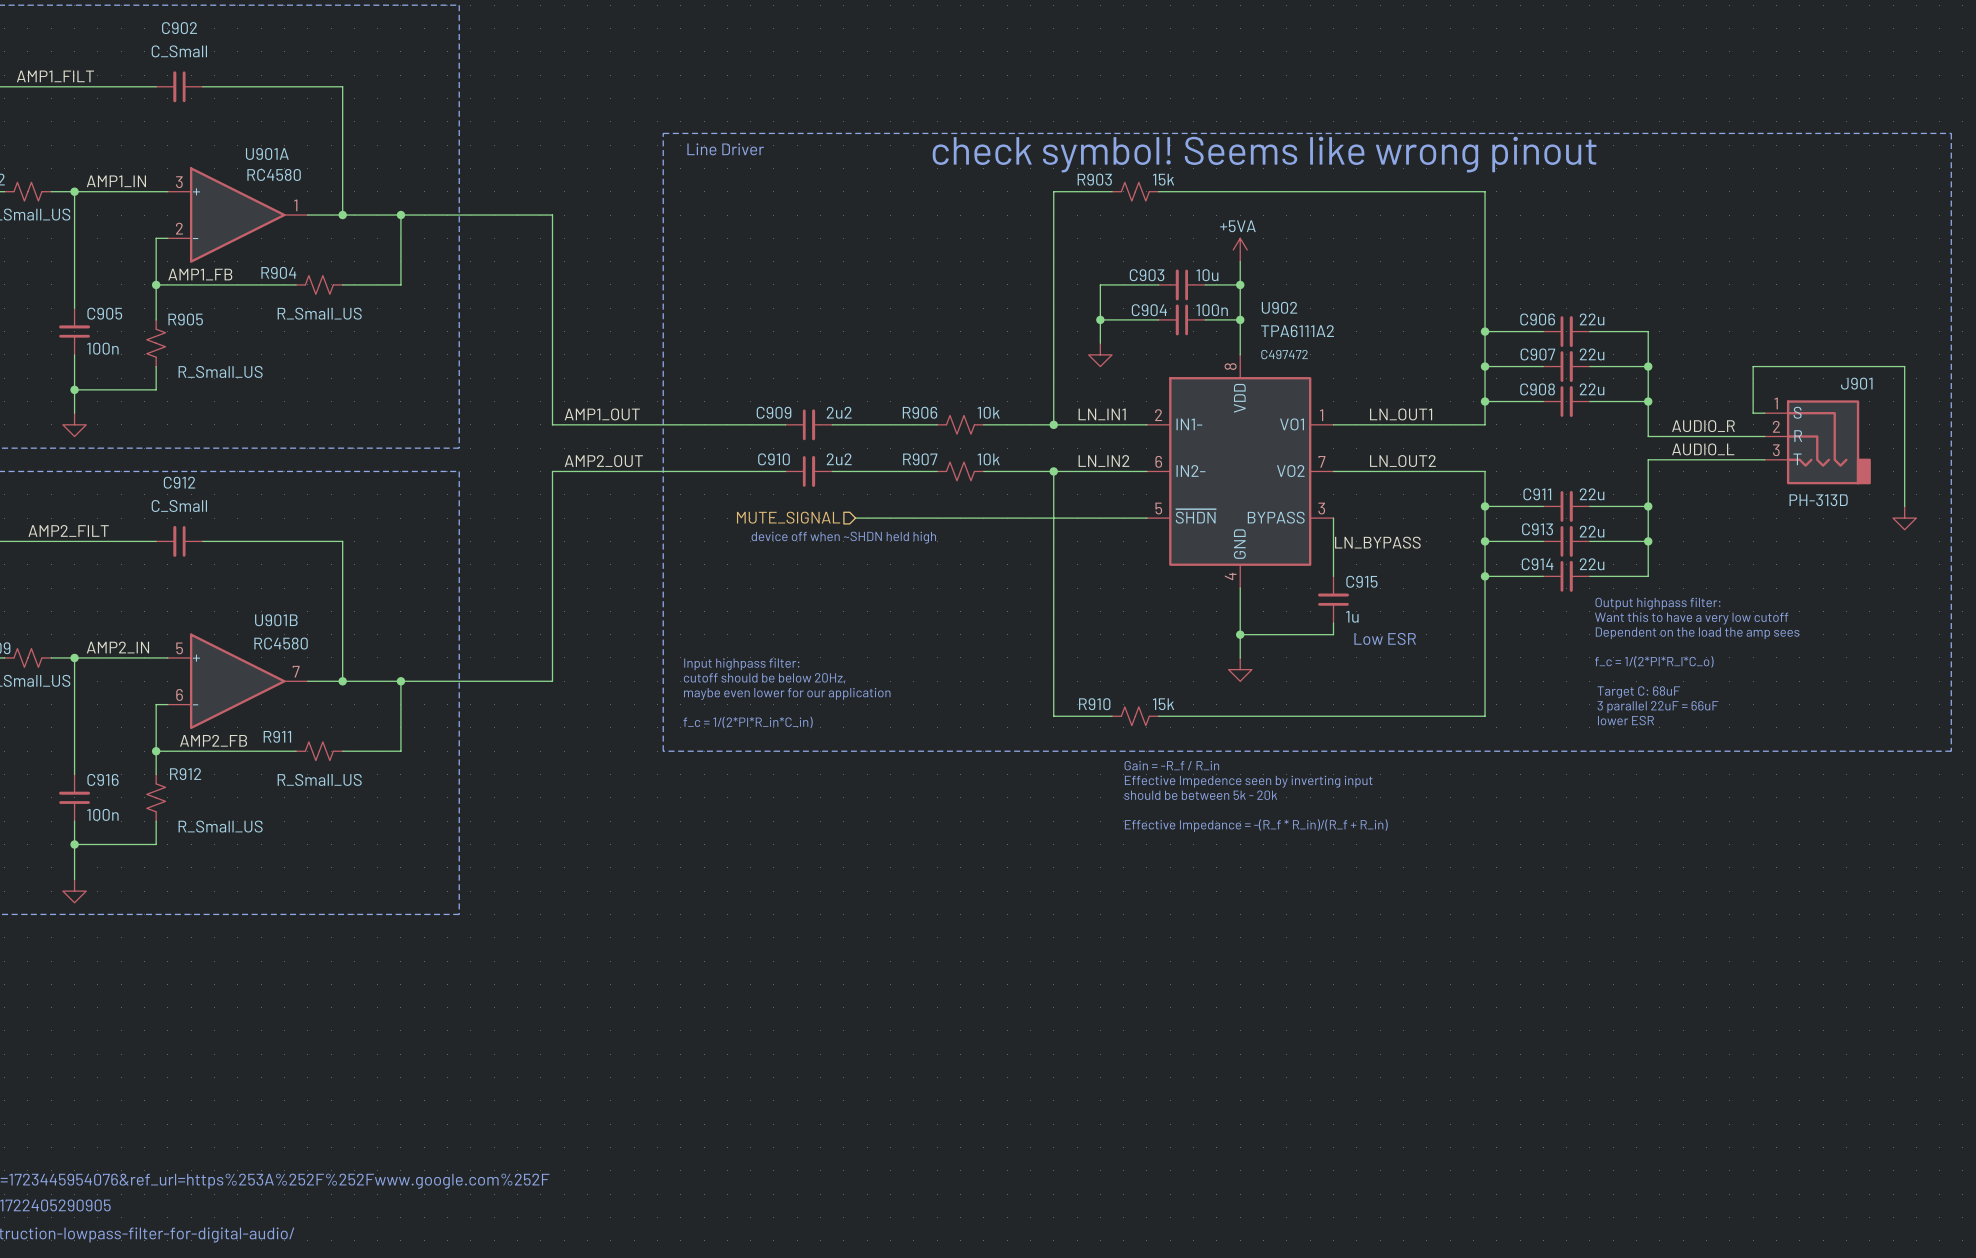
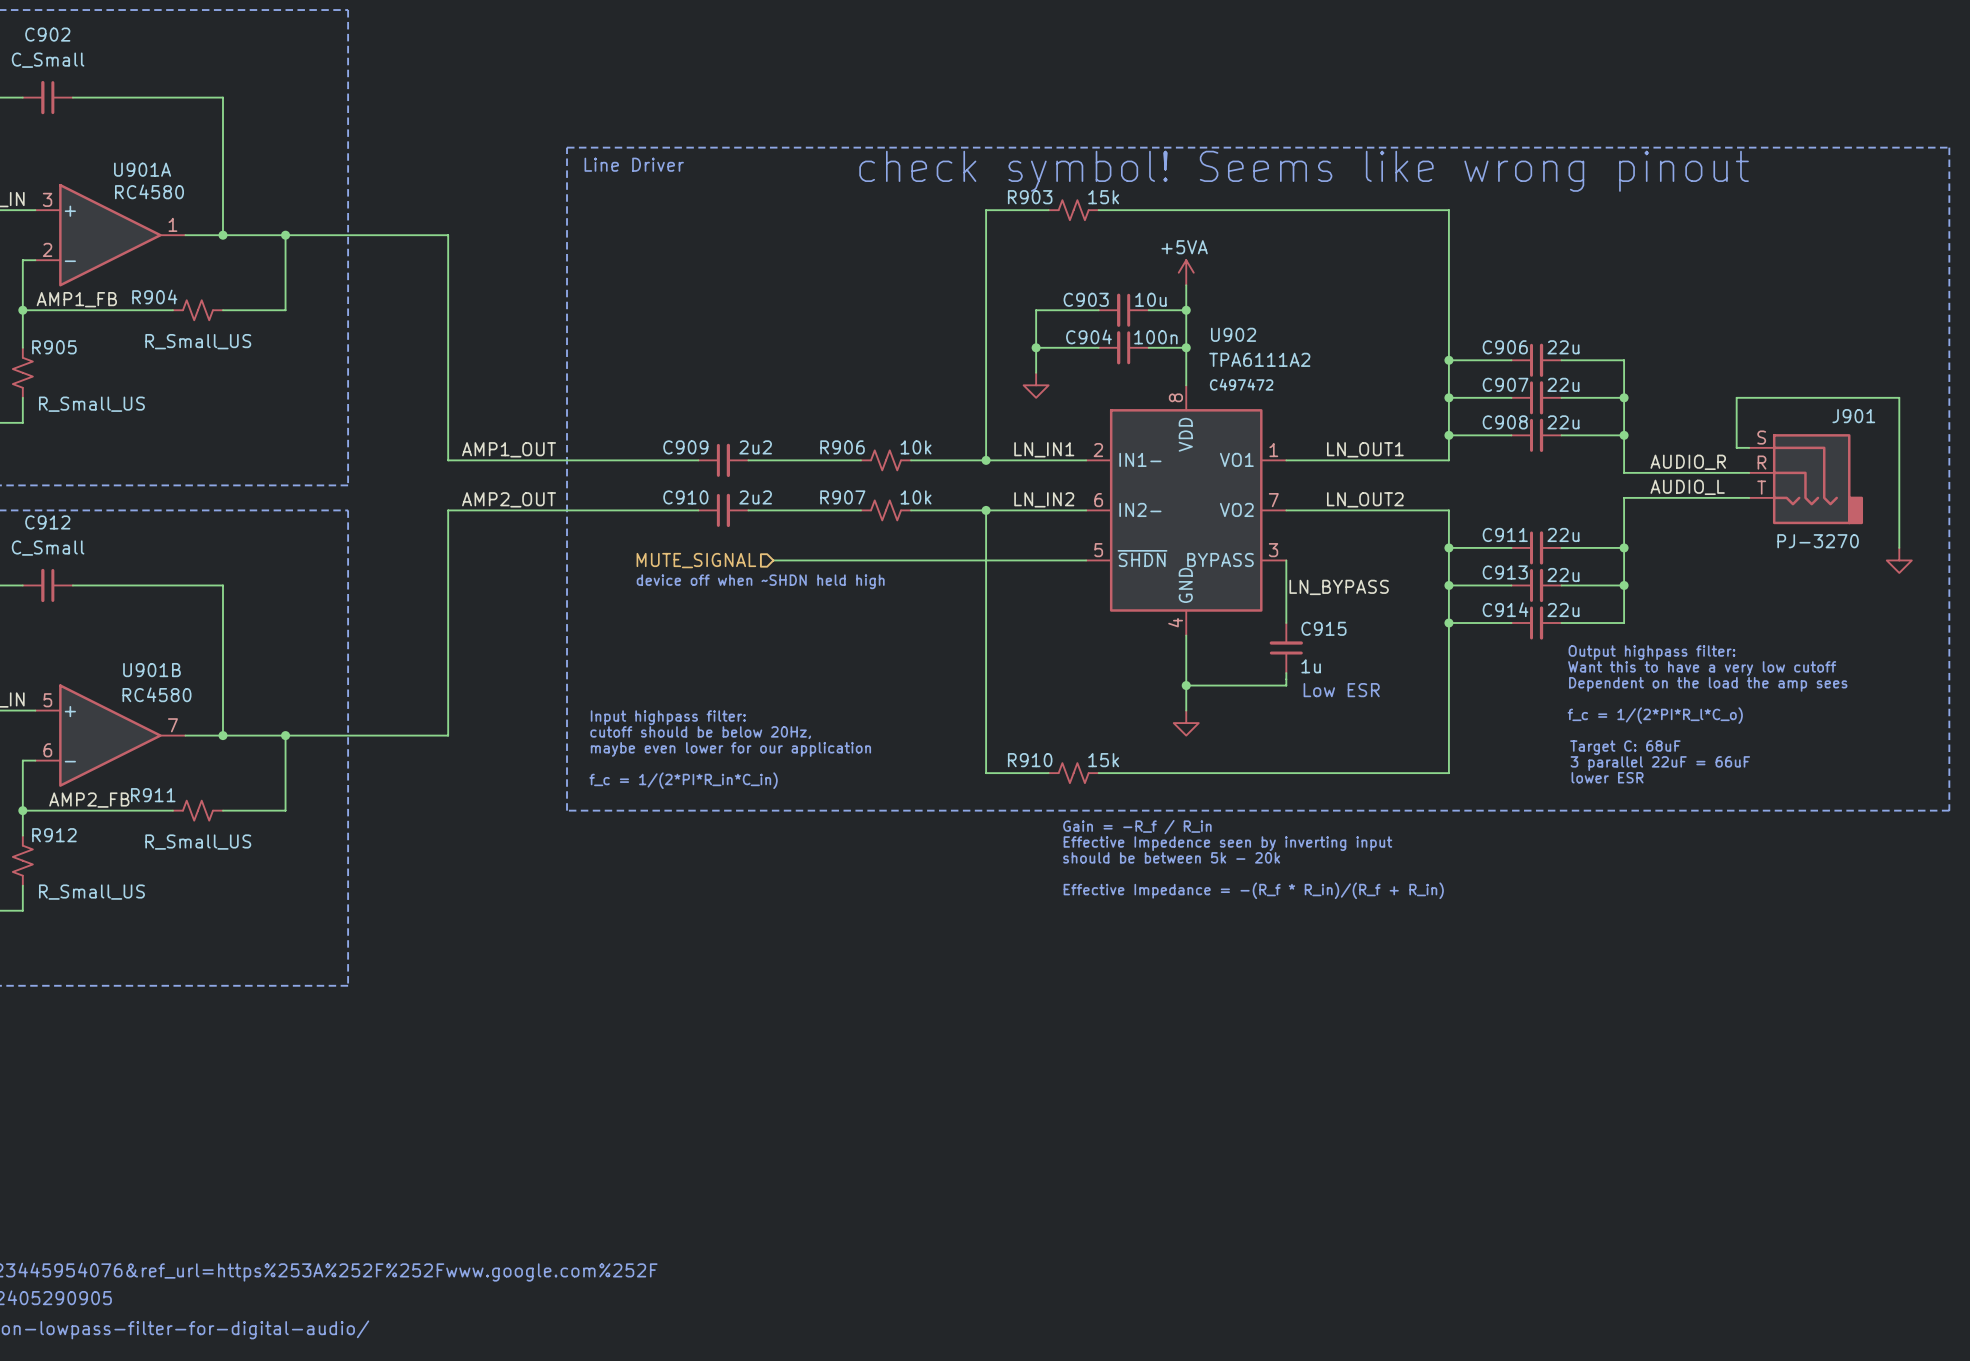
J901 pin number: 1 (1776, 403) -> S (1761, 437)
J901 pin name: S (1797, 412) -> none
J901 pin number: 2 (1776, 426) -> R (1761, 462)
J901 pin name: R (1798, 436) -> none
J901 pin number: 3 (1776, 450) -> T (1761, 487)
J901 pin name: T (1797, 459) -> none
J901 value: PH-313D (1818, 500) -> PJ-3270 (1818, 541)

